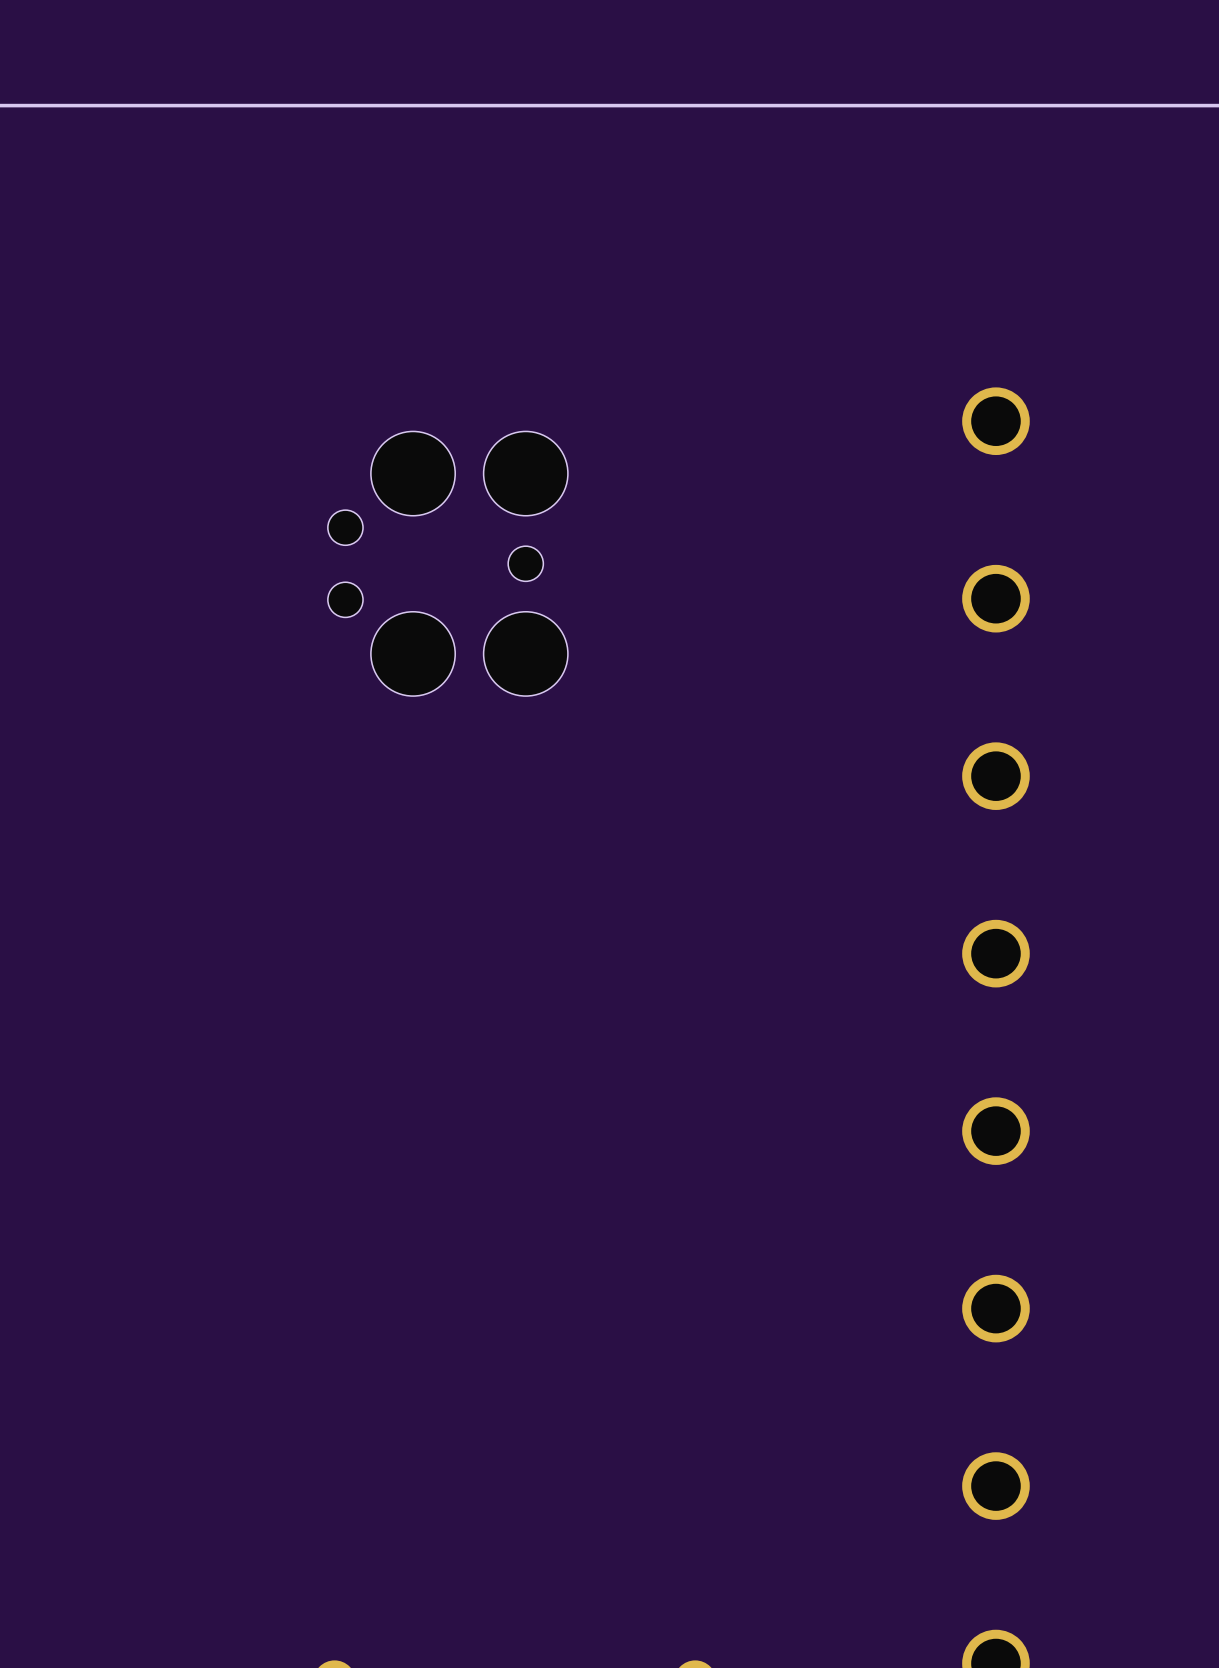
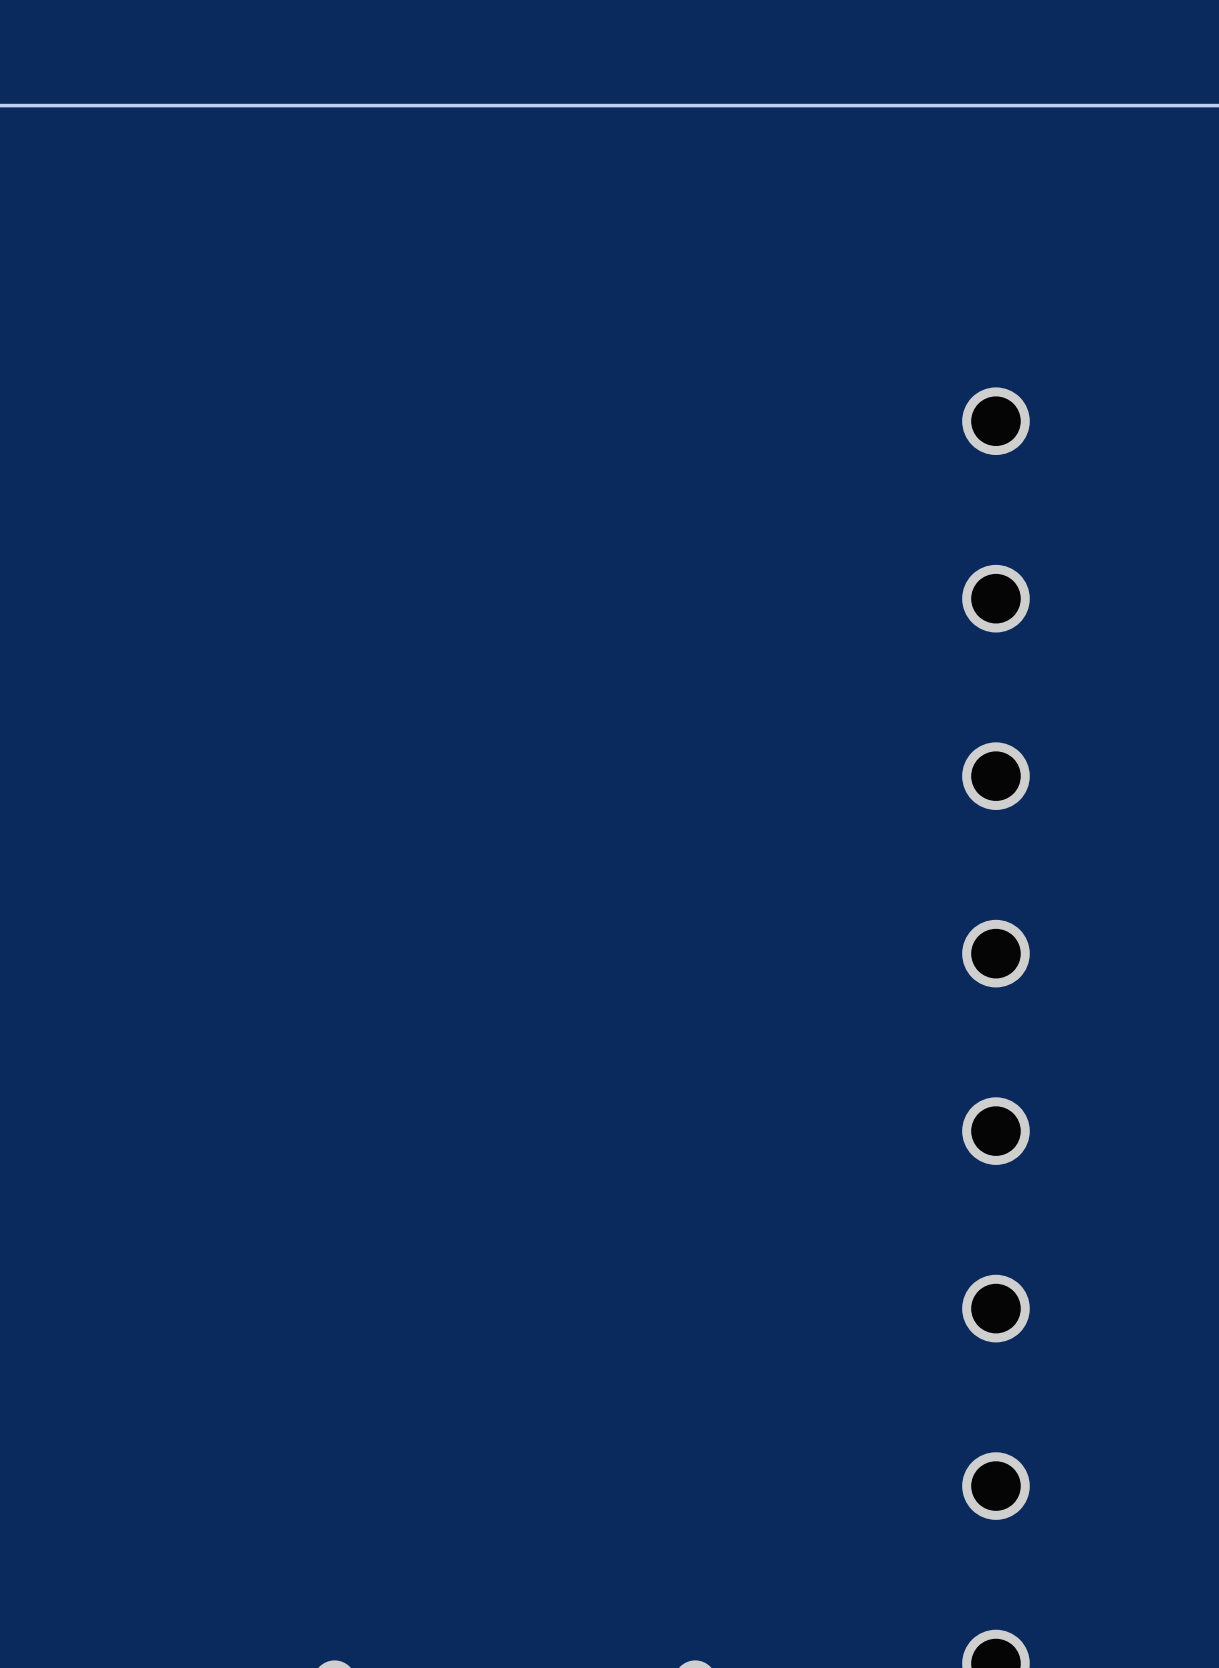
part: (447, 563) -> none

